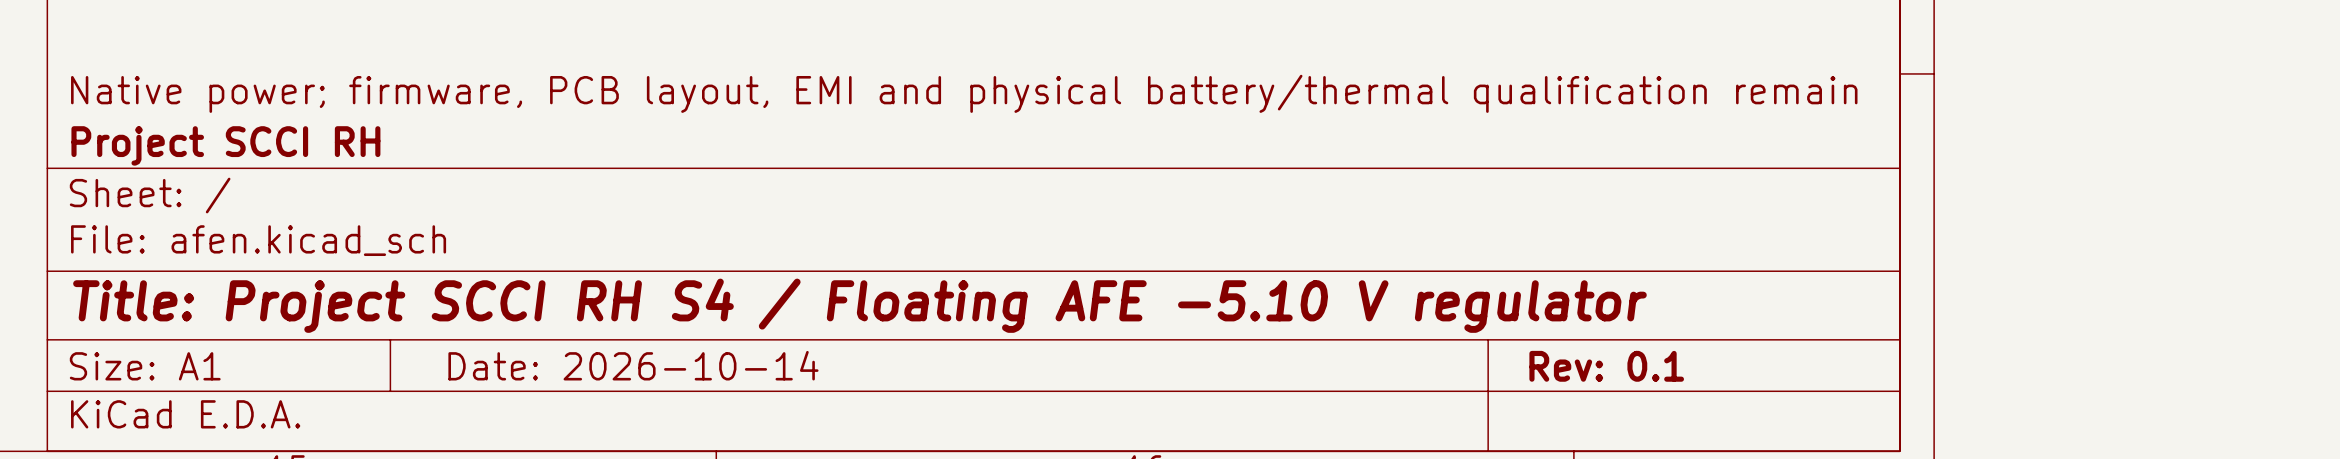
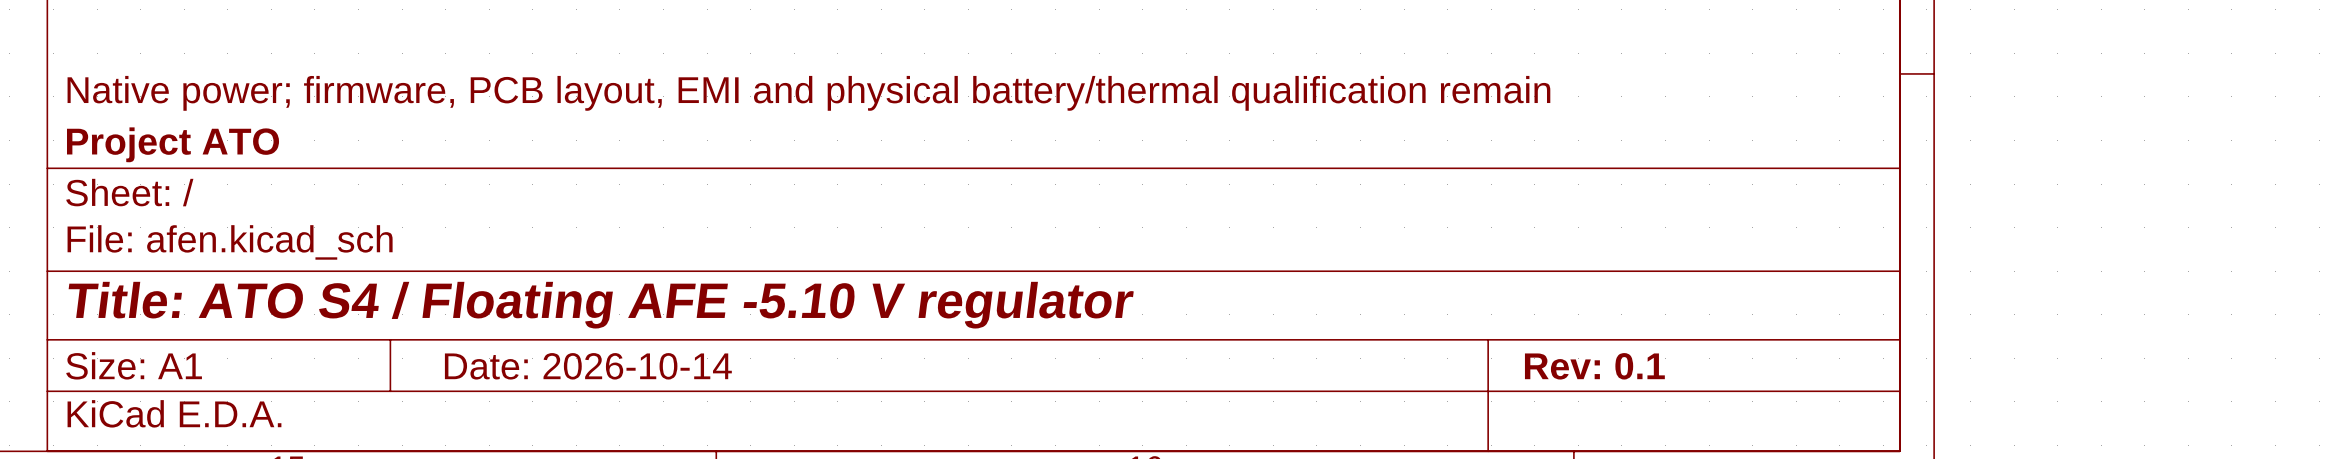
title block: Project SCCI RH (225, 145) -> Project ATO (173, 144)
title block: Title: Project SCCI RH S4 / Floating AFE -5.10 V regulator (859, 305) -> Title: ATO S4 / Floating AFE -5.10 V regulator (601, 305)

